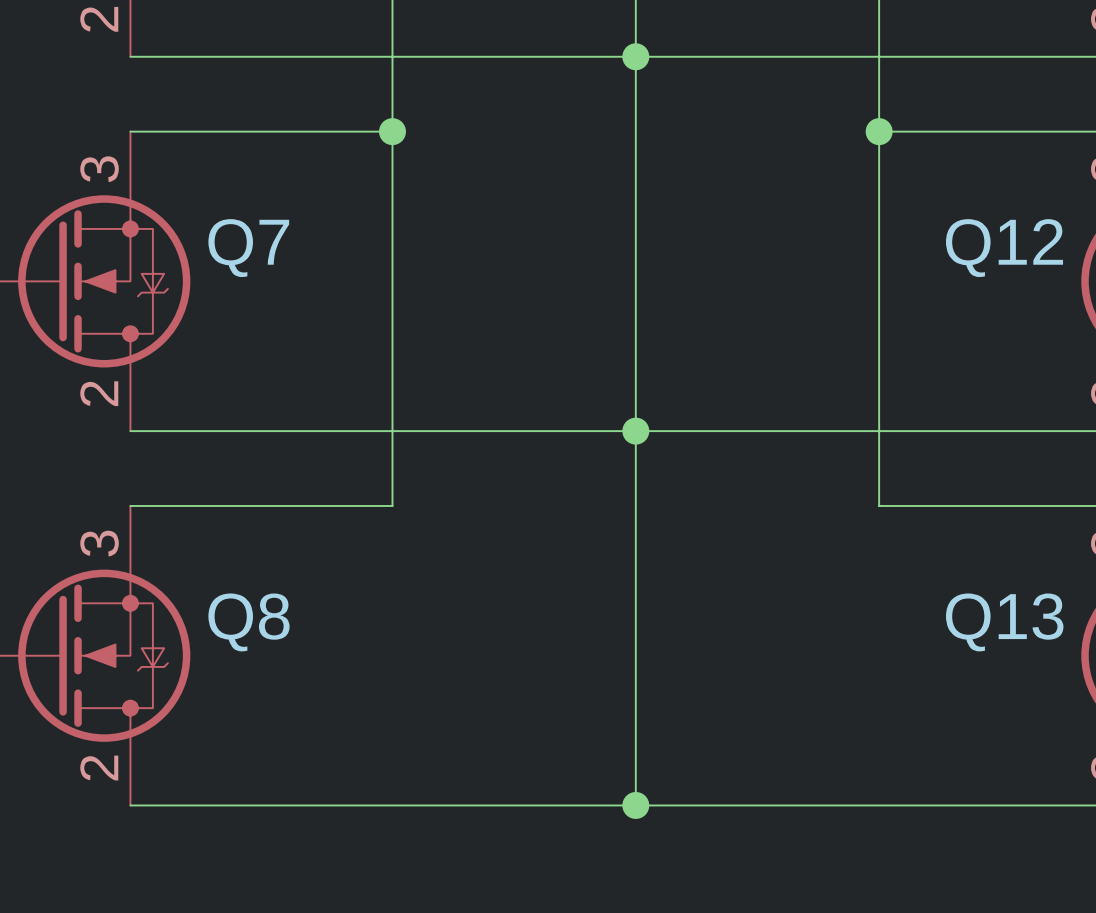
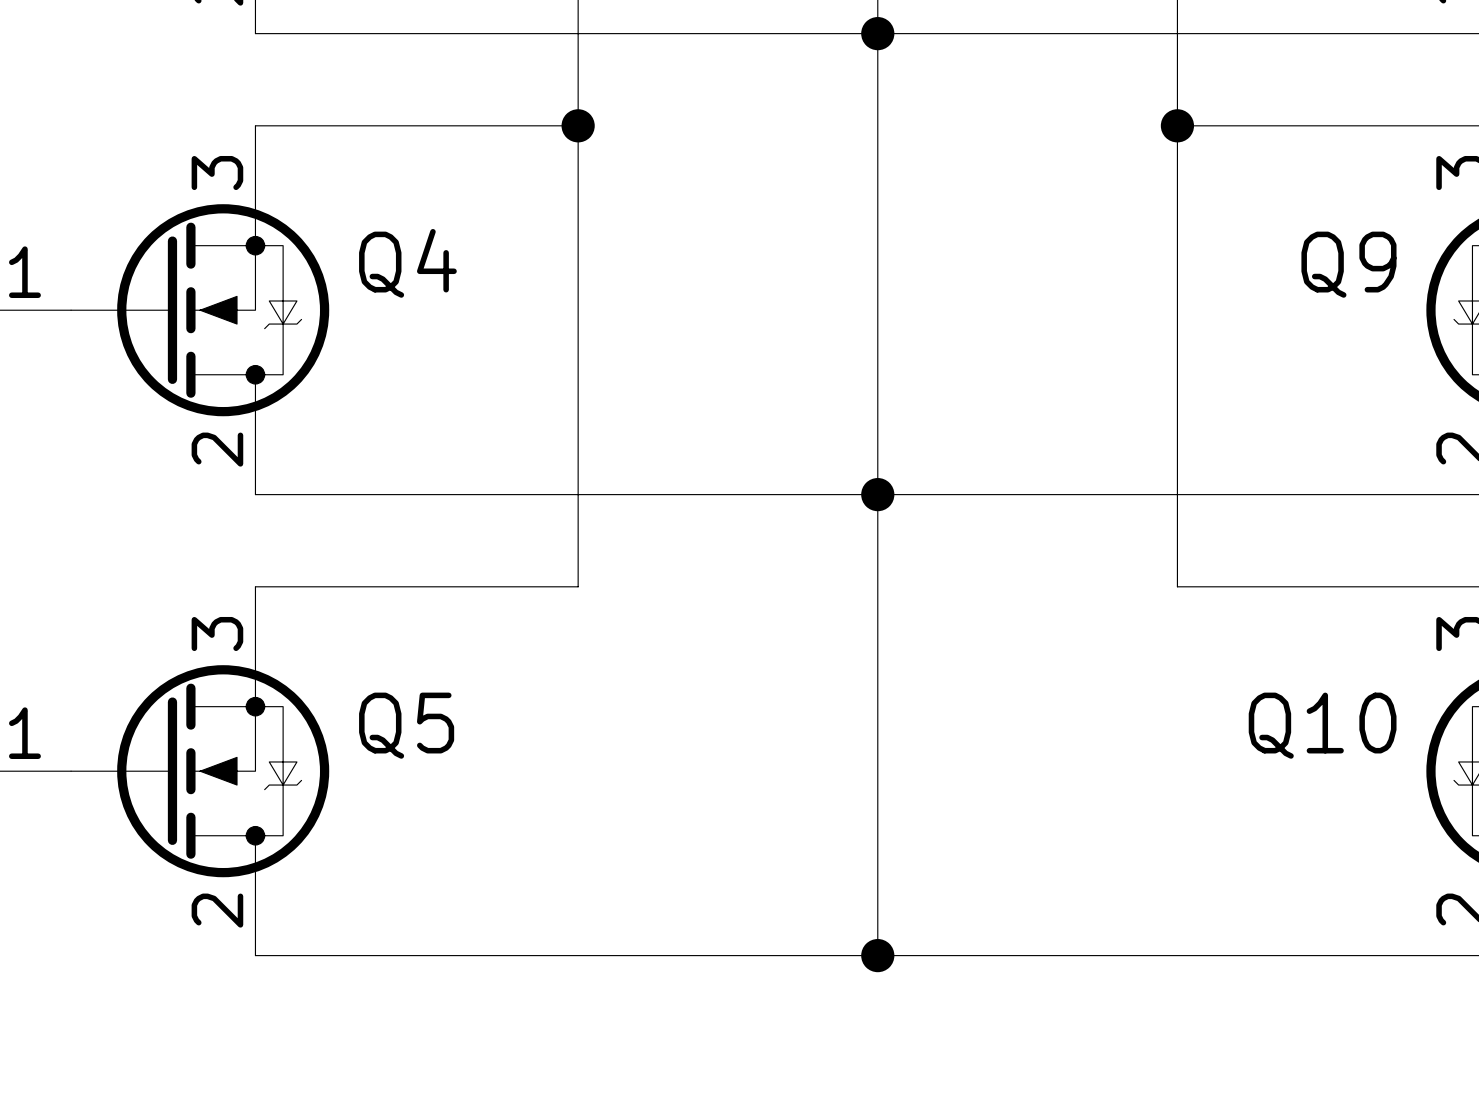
Q7 name: Q7 (248, 248) -> Q4 (407, 263)
Q12 name: Q12 (1004, 248) -> Q9 (1348, 264)
Q8 name: Q8 (248, 622) -> Q5 (406, 725)
Q13 name: Q13 (1004, 622) -> Q10 (1322, 725)

